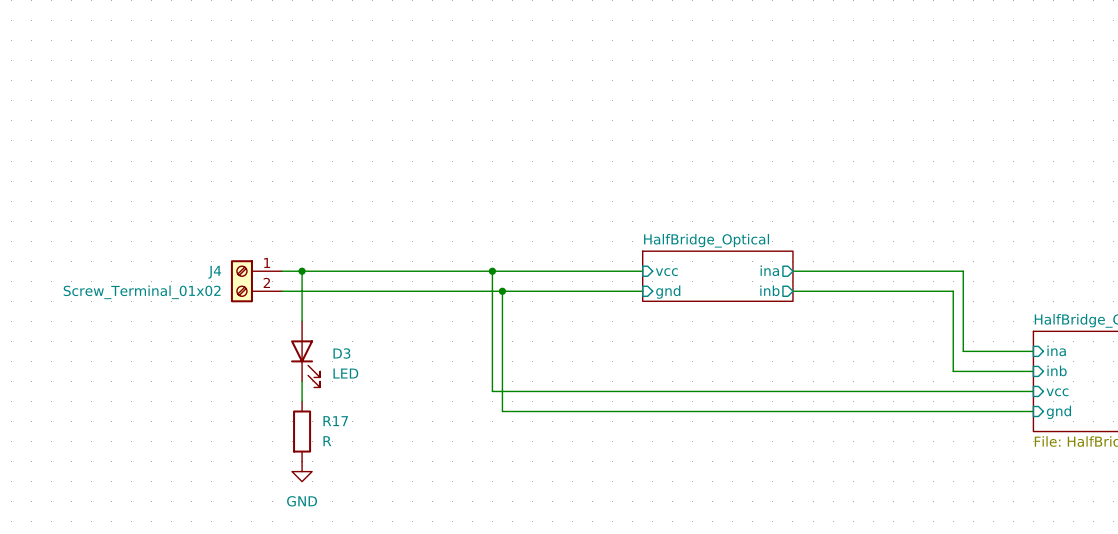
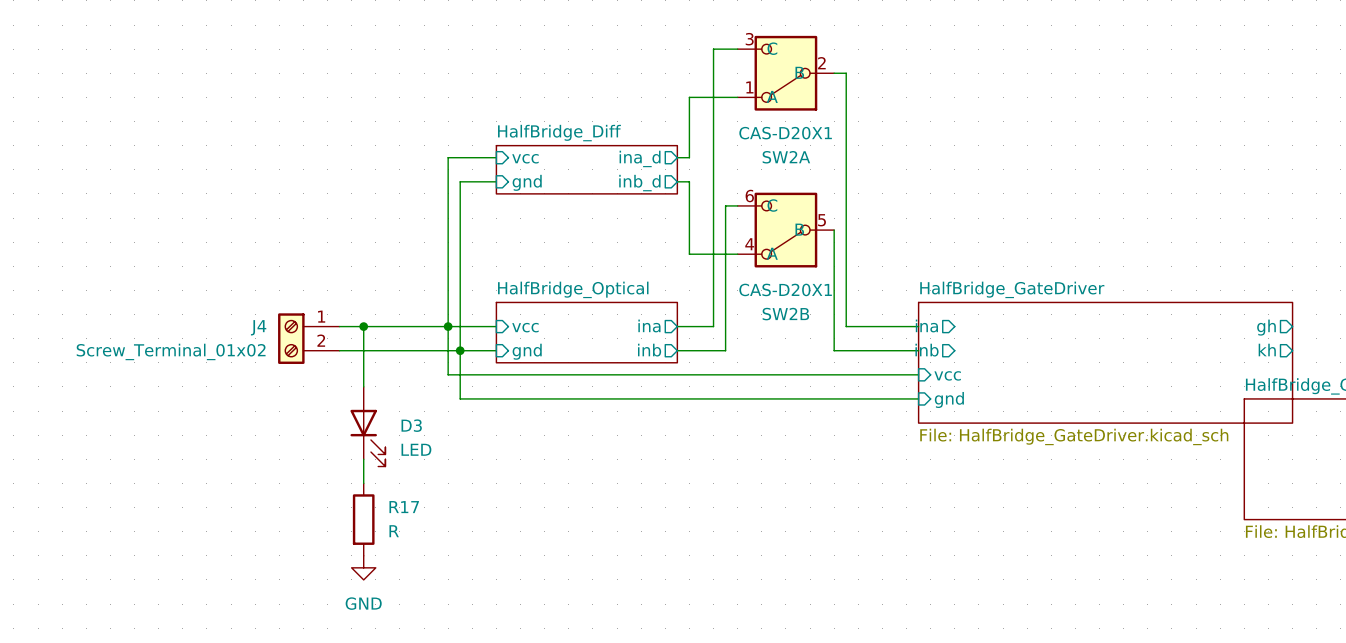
SW2A: none -> CAS-D20X1 (785, 73)
wire: none -> (834, 73) (846, 73) (846, 326) (918, 326)
wire: none -> (737, 97) (689, 97) (689, 157) (677, 157)
wire: none -> (496, 157) (448, 157) (448, 374) (918, 374)
sheet pin: none -> vcc (525, 158)
sheet pin: none -> ina_d (640, 158)
sheet HalfBridge_Diff: none -> (586, 169)
wire: none -> (496, 181) (460, 181) (460, 398) (918, 398)
sheet pin: none -> gnd (527, 182)
wire: none -> (677, 181) (689, 181) (689, 254) (737, 254)
sheet pin: none -> inb_d (639, 183)
SW2B: none -> CAS-D20X1 (785, 230)
wire: none -> (834, 230) (834, 350) (918, 350)
sheet pin: none -> ina (649, 325)
junction: none -> (448, 326)
wire: (412, 271) (562, 271) -> none
wire: (492, 271) (492, 391) (1033, 391) -> none
junction: (492, 271) -> none
wire: (592, 271) (642, 271) -> (713, 326) (713, 49) (737, 49)
wire: (792, 271) (963, 271) (963, 351) (1033, 351) -> none
sheet pin: none -> vcc (525, 327)
sheet pin: vcc (666, 272) -> none
sheet pin: none -> gh (1266, 327)
sheet HalfBridge_Optical: none -> (586, 332)
sheet HalfBridge_Optical: (717, 276) -> none
sheet pin: none -> inb (649, 350)
sheet pin: none -> kh (1267, 350)
junction: none -> (460, 350)
wire: (412, 291) (562, 291) -> none
wire: (502, 291) (502, 411) (1033, 411) -> none
junction: (502, 291) -> none
wire: (602, 291) (642, 291) -> (725, 350) (725, 205) (737, 205)
wire: (792, 291) (953, 291) (953, 371) (1033, 371) -> none
sheet pin: none -> gnd (527, 351)
sheet pin: gnd (668, 292) -> none
sheet HalfBridge_GateDriver: none -> File: HalfBridge_GateDriver.kicad_sch (1105, 362)
sheet pin: none -> vcc (947, 375)
sheet pin: none -> gnd (949, 399)
sheet pin: ina (1056, 350) -> none
sheet pin: inb (1057, 370) -> none
sheet pin: vcc (1057, 392) -> none
sheet pin: gnd (1058, 412) -> none

